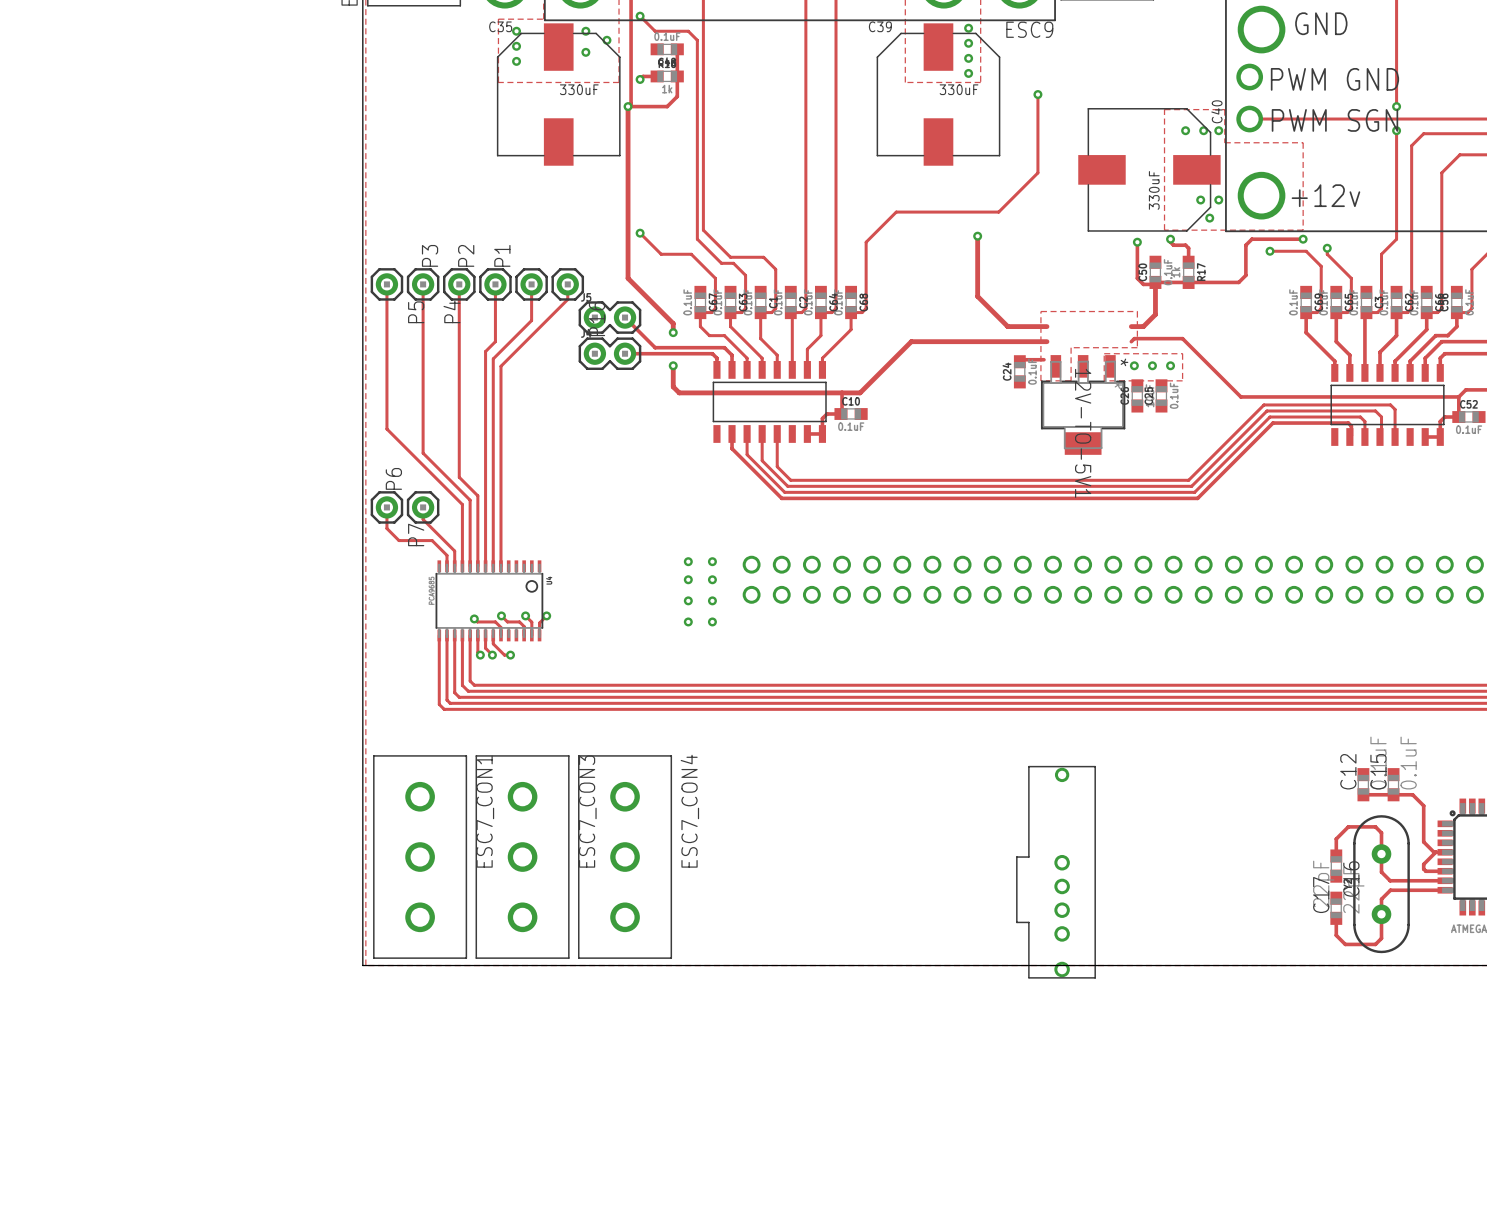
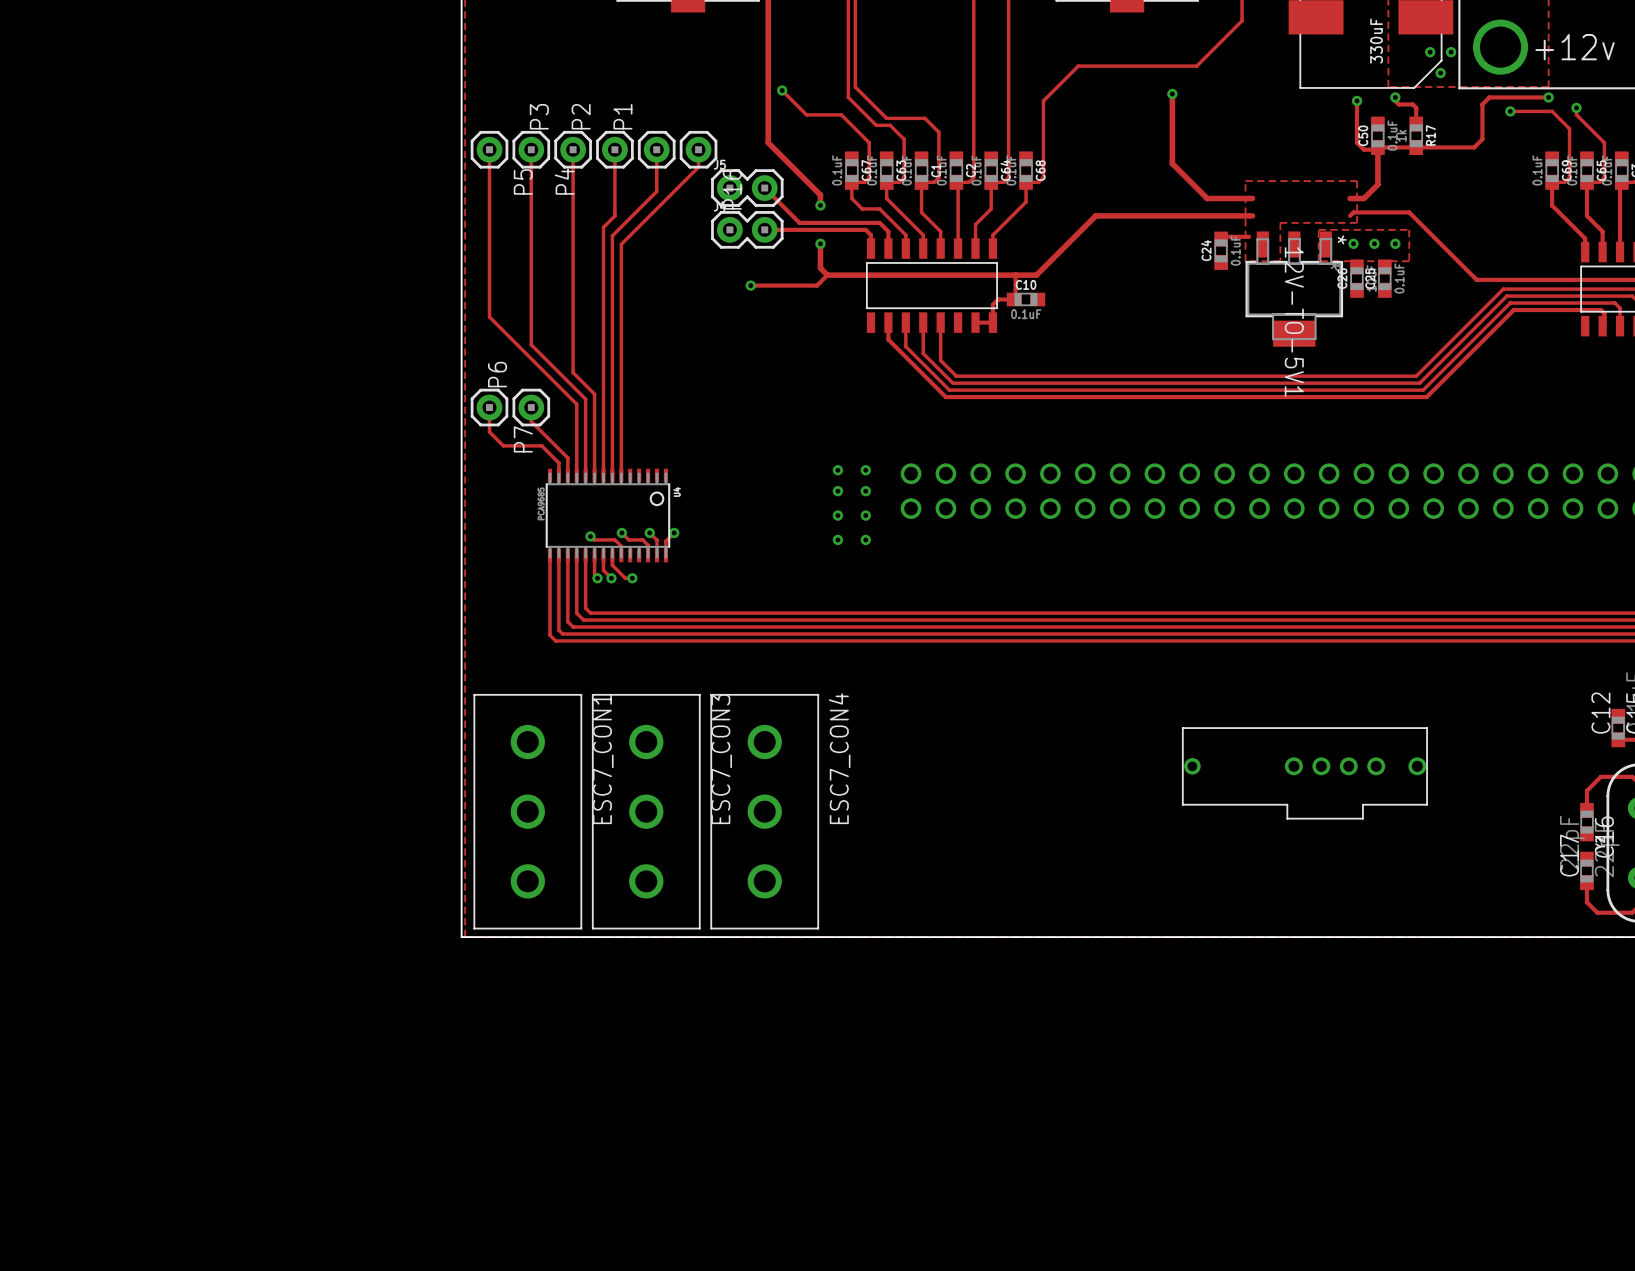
track: none -> (827, 275) (817, 285) (750, 285)
via: none -> (750, 285)
part rotation: 0° (1056, 872) -> 90° counterclockwise (1304, 773)

